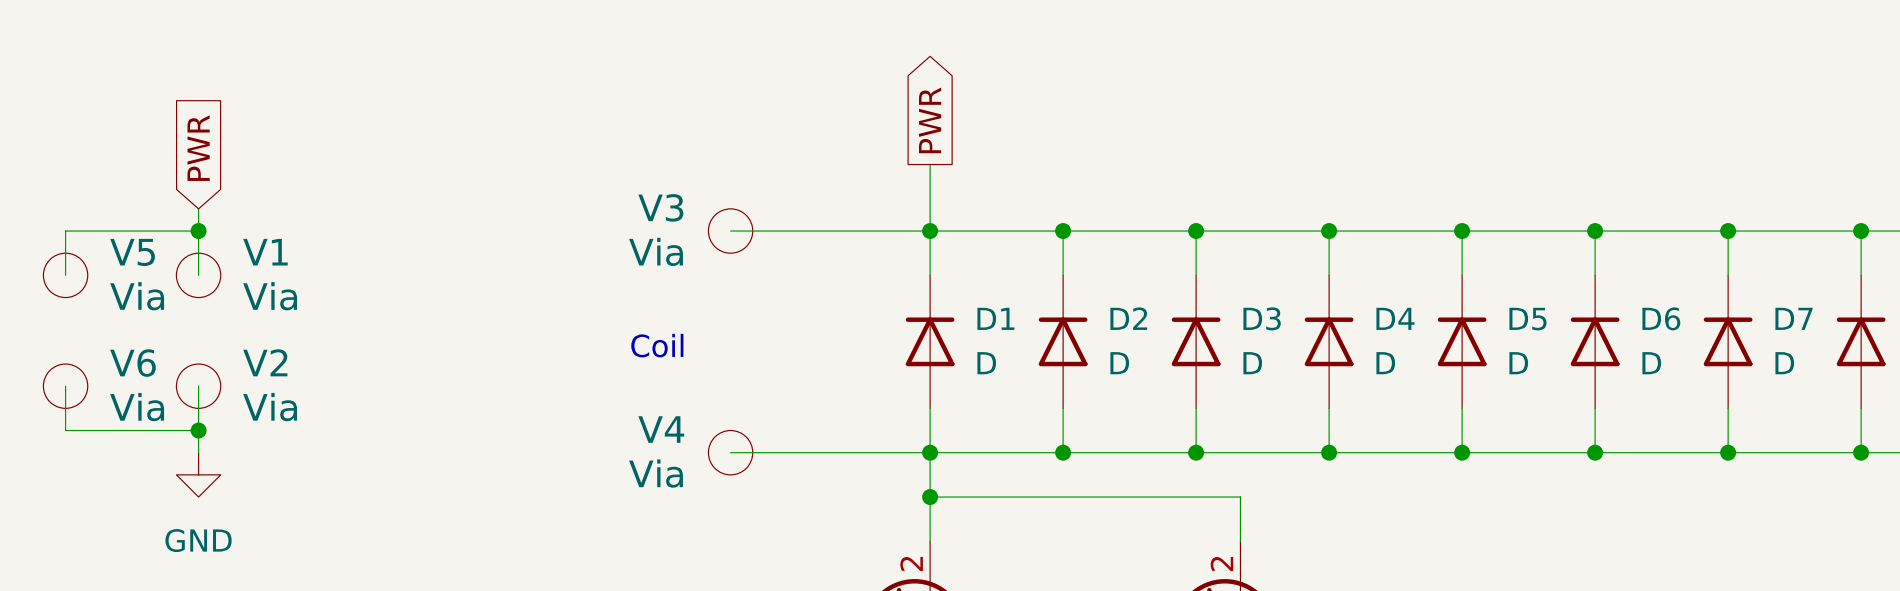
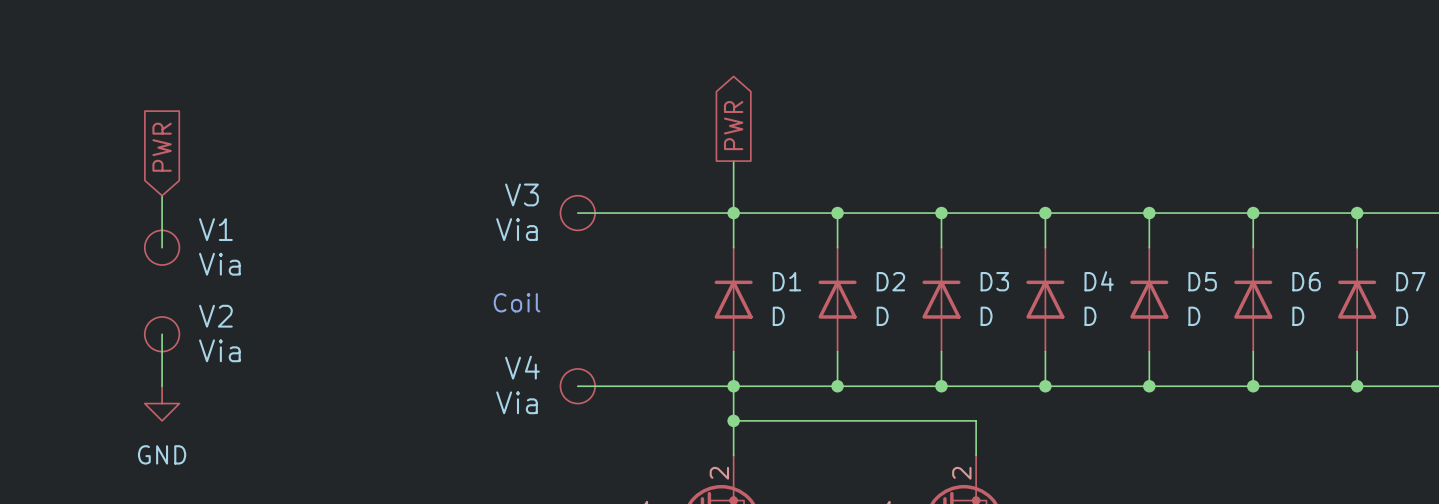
wire: (198, 231) (65, 231) (65, 275) -> none
junction: (198, 231) -> none
V5: Via (65, 275) -> none
wire: (65, 386) (65, 430) (198, 430) -> none
V6: Via (65, 386) -> none
junction: (198, 430) -> none

